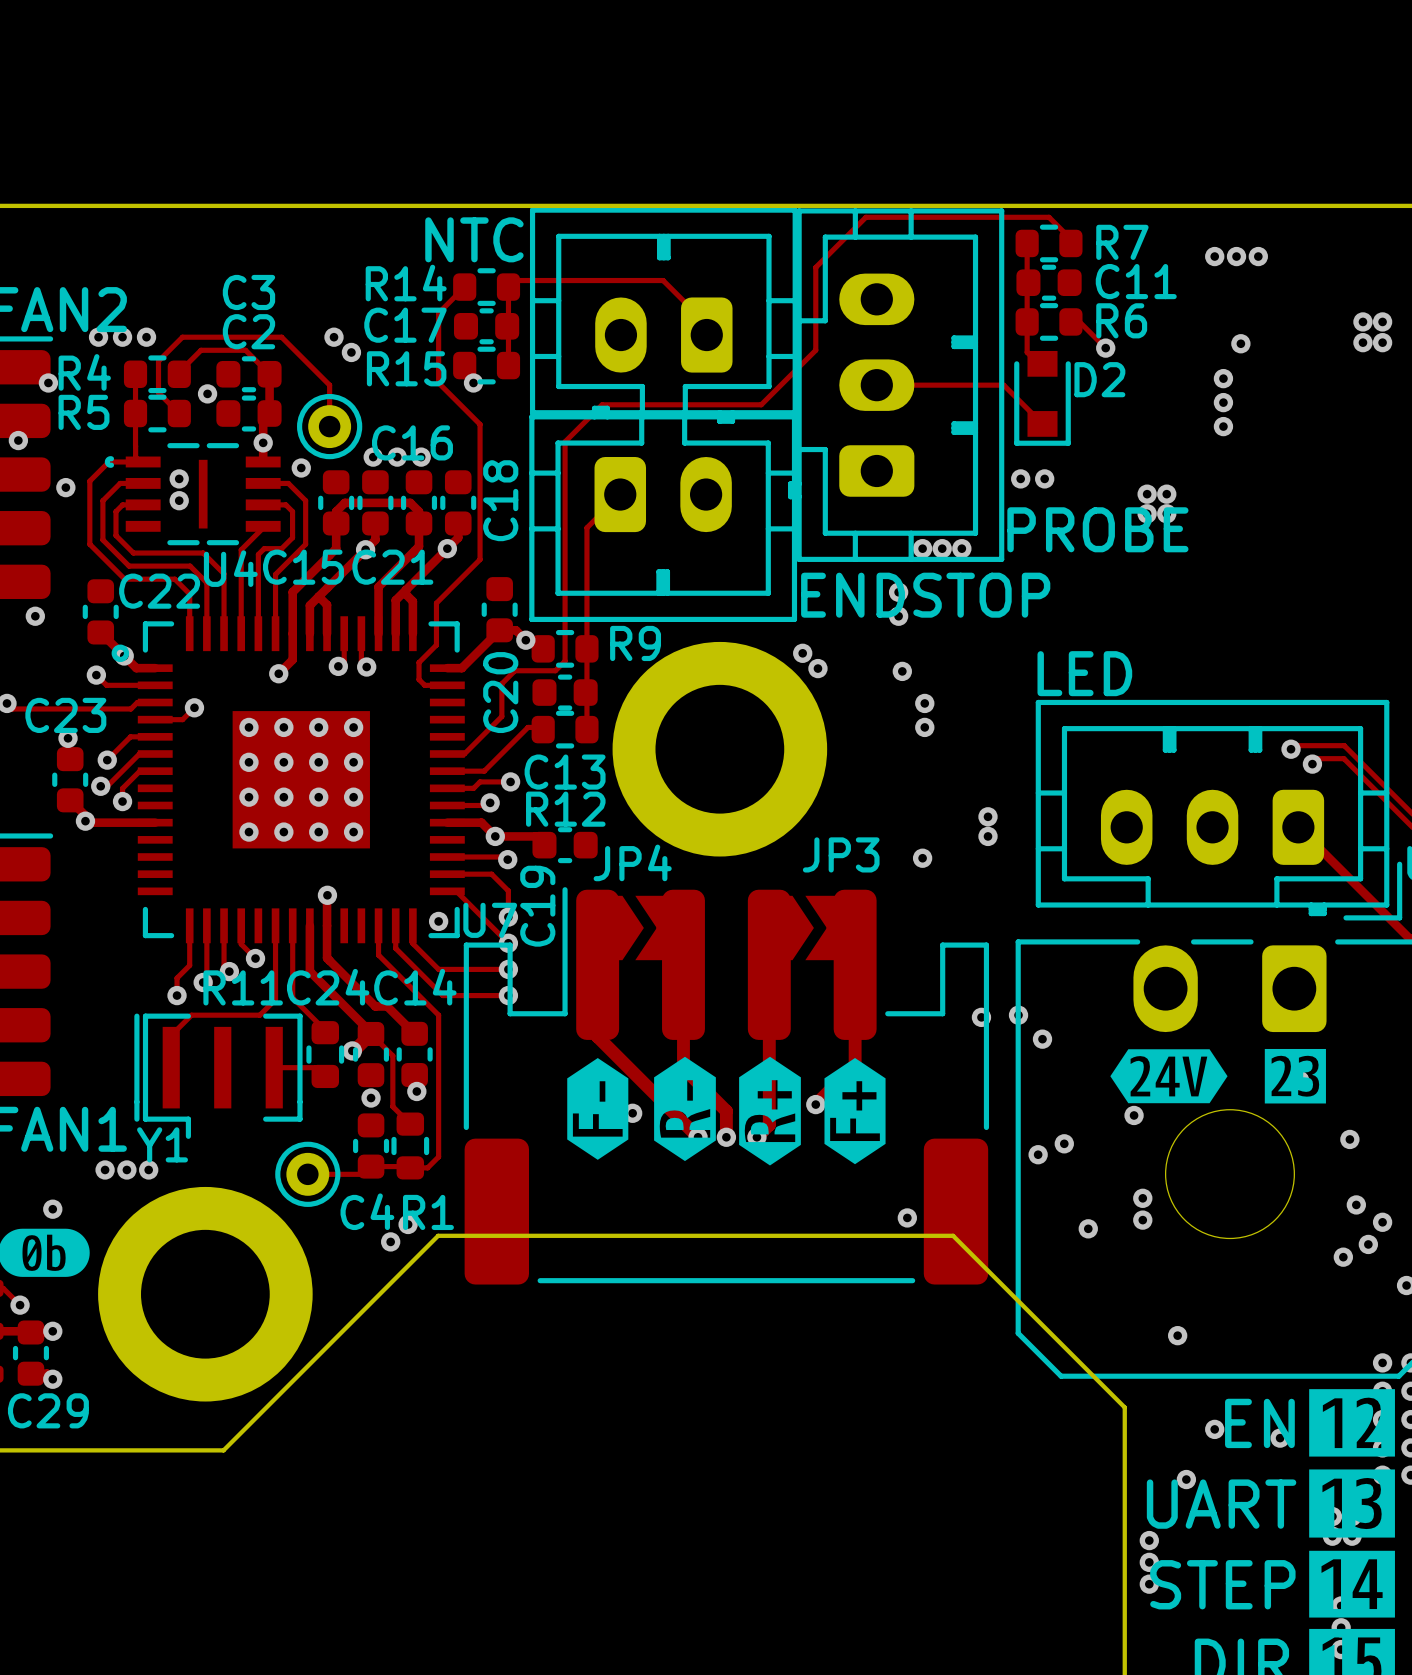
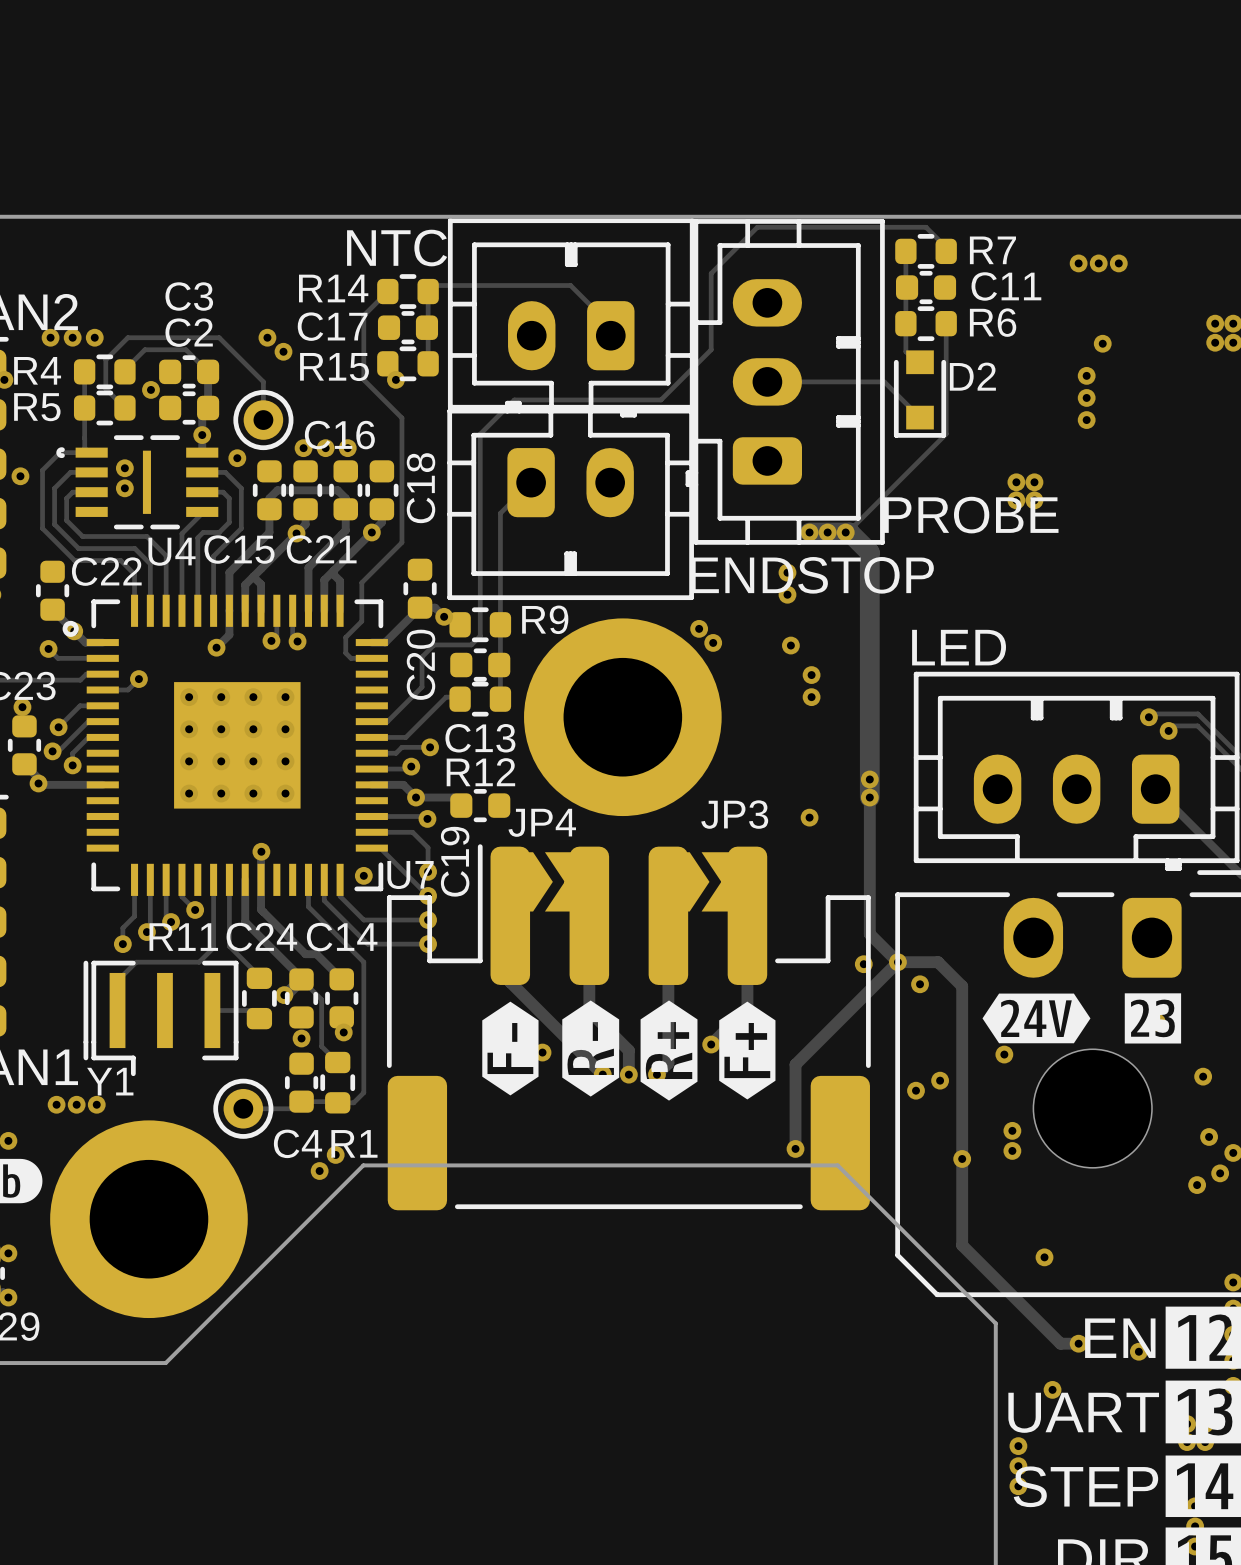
track: (1070, 321) (1079, 321) (1105, 348) -> (946, 323) (946, 434) (845, 532)
via: (1105, 348) -> none
via: (1020, 478) -> none
via: (1044, 478) -> none
track: none -> (809, 532) (849, 532) (869, 552) (869, 797)
track: none -> (869, 779) (869, 934) (897, 962)
track: none -> (897, 962) (795, 1064) (795, 1148)
track: none -> (897, 962) (938, 962) (962, 986) (962, 1245) (1060, 1343) (1078, 1343)

